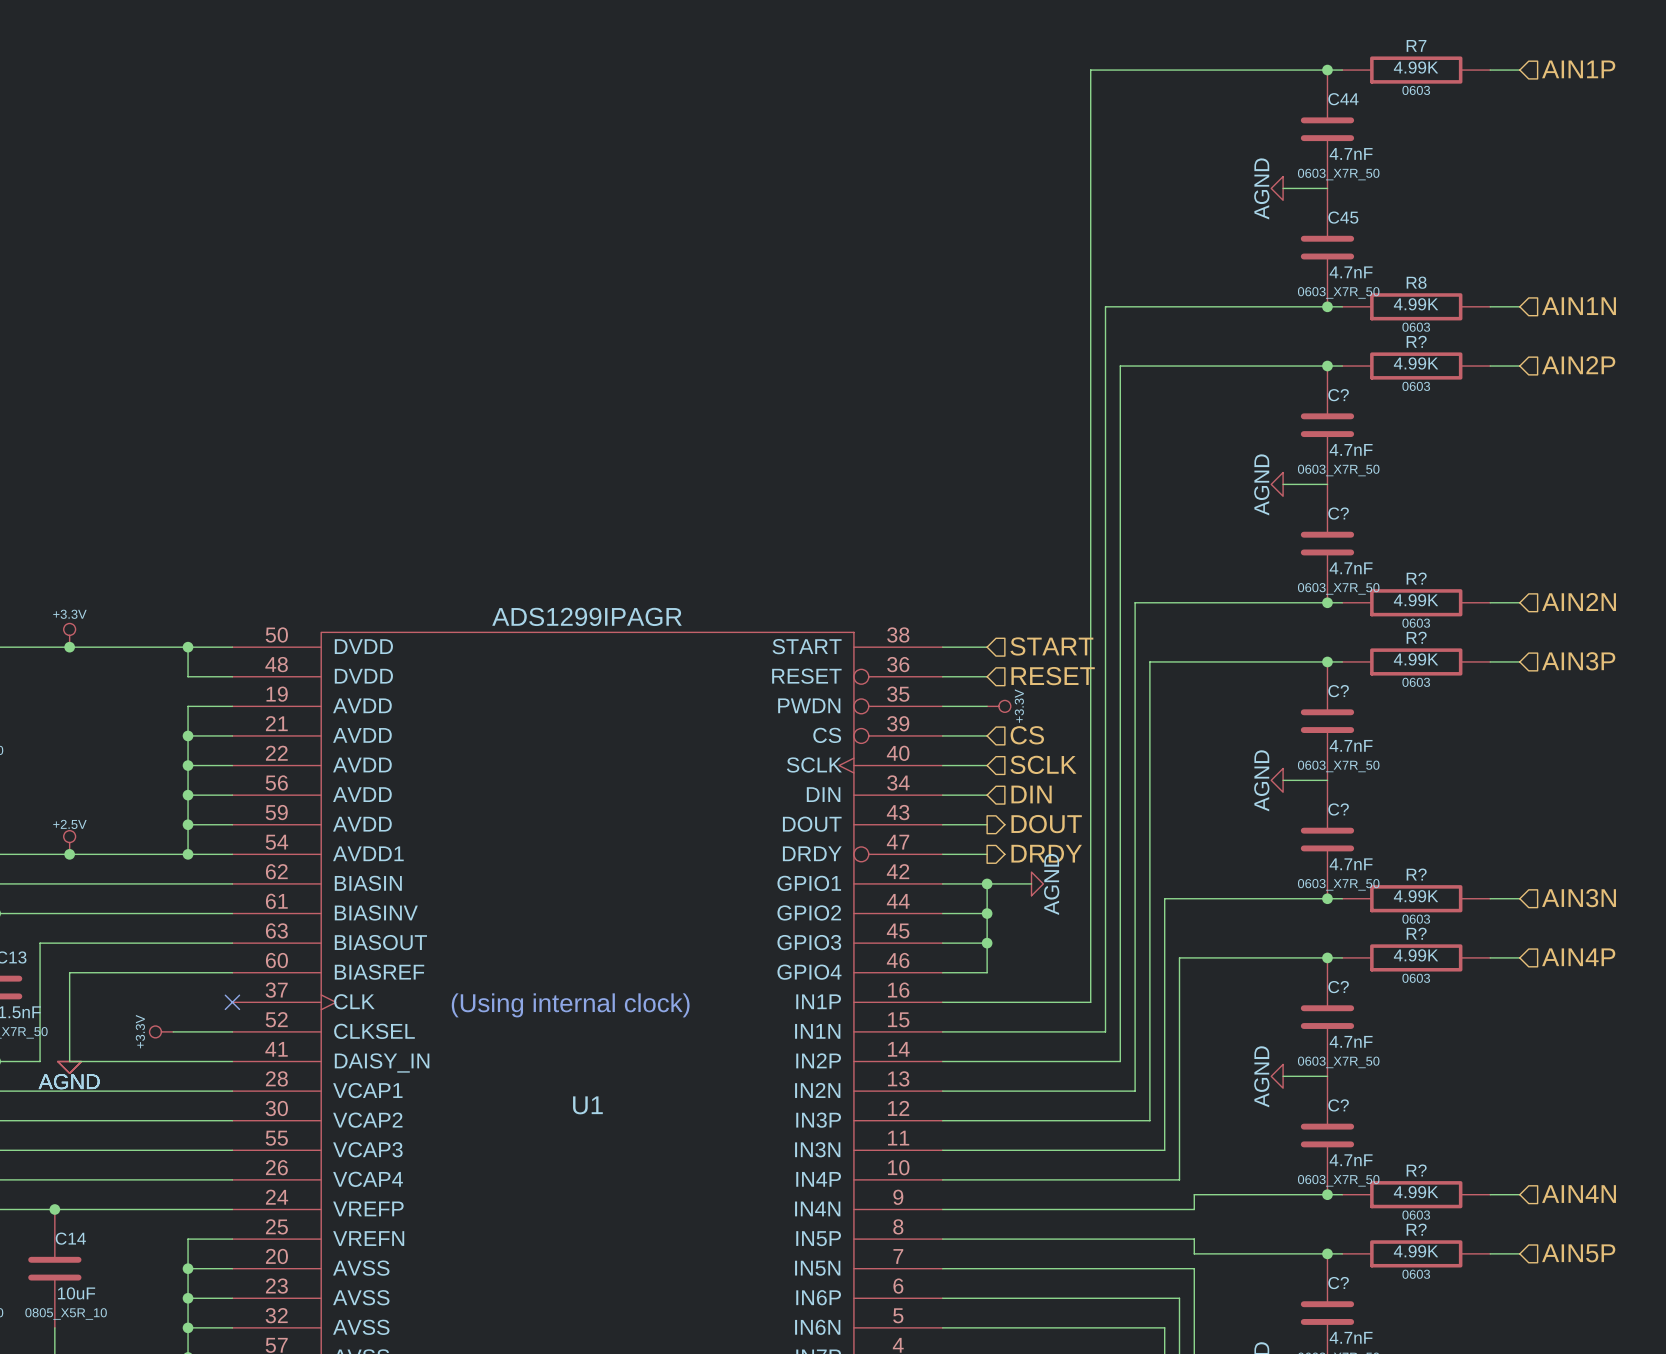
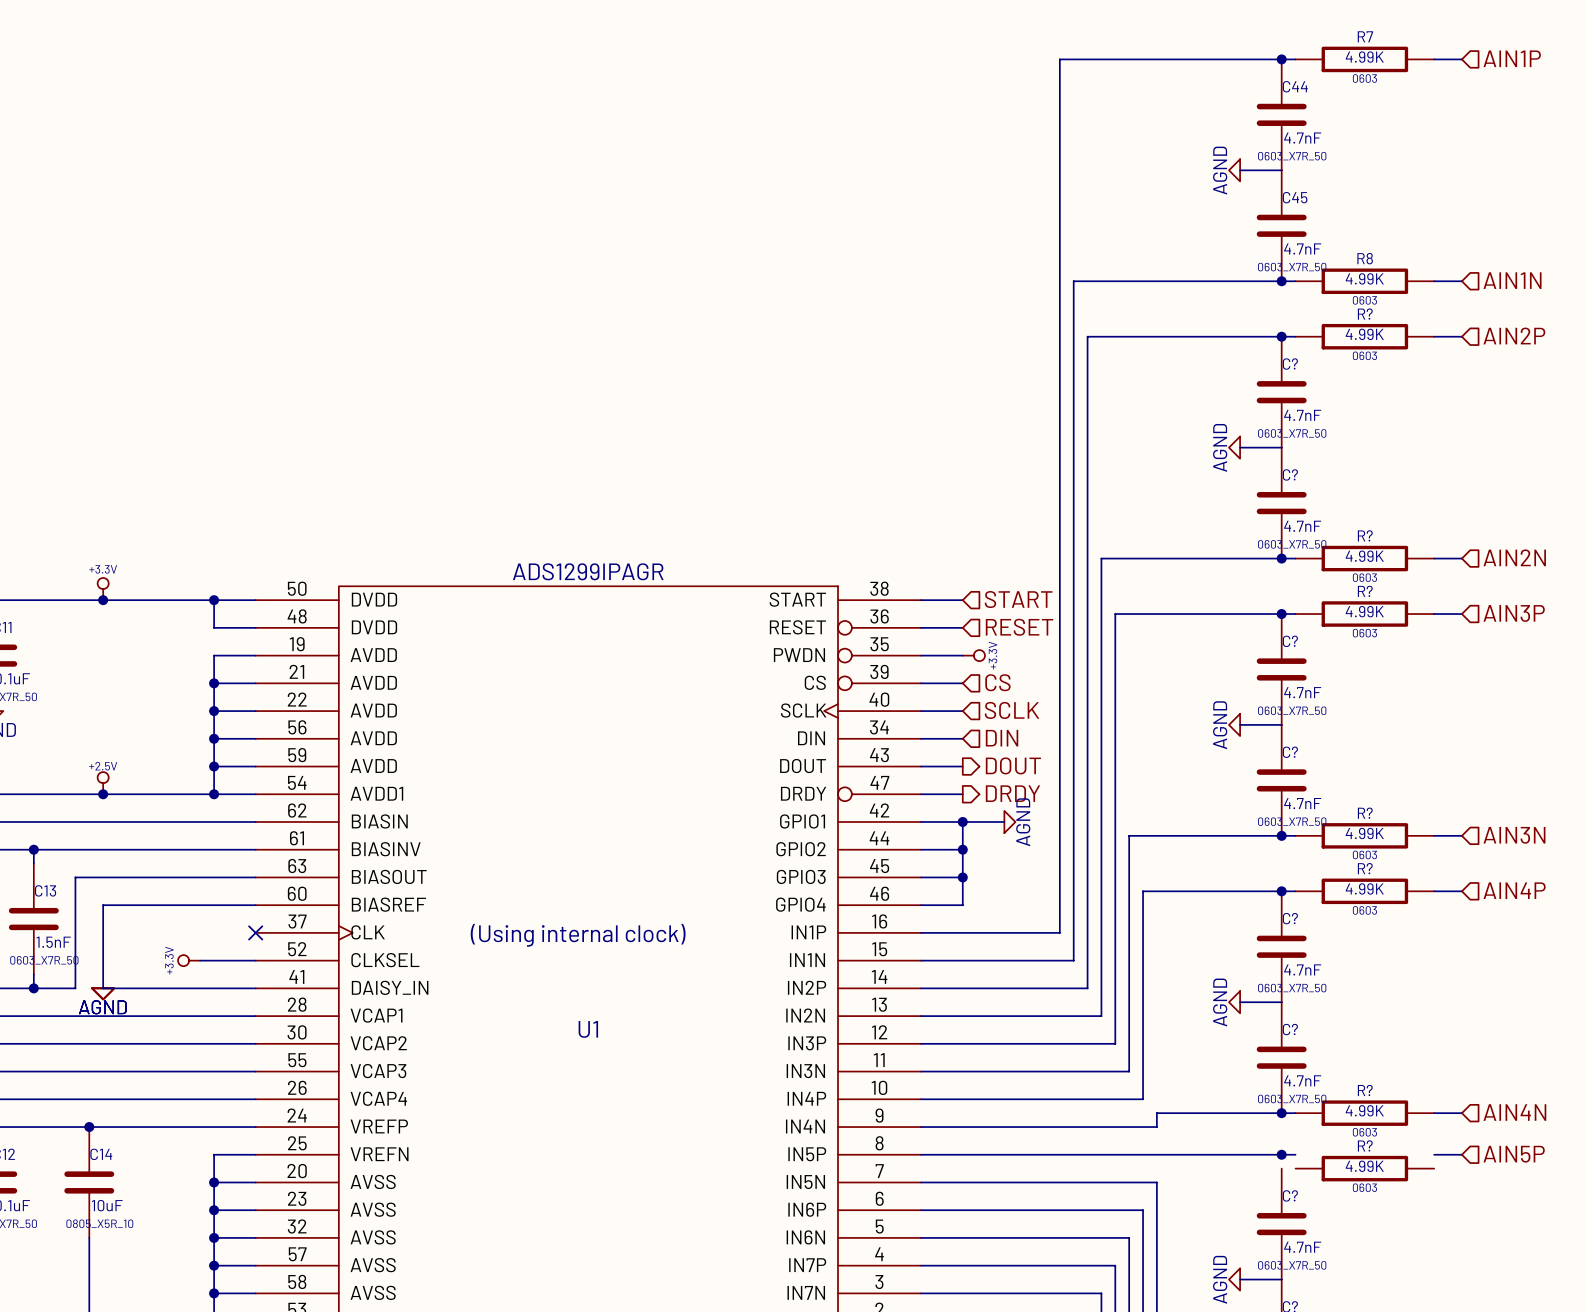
wire: (1194, 1239) (1194, 1253) (1342, 1253) -> (1156, 1154) (1295, 1154)
junction position: (1327, 1253) -> (1281, 1154)
wire: (1490, 1253) (1519, 1253) -> (1434, 1154) (1461, 1154)
hierarchical label position: AIN5P (1578, 1253) -> AIN5P (1514, 1154)

